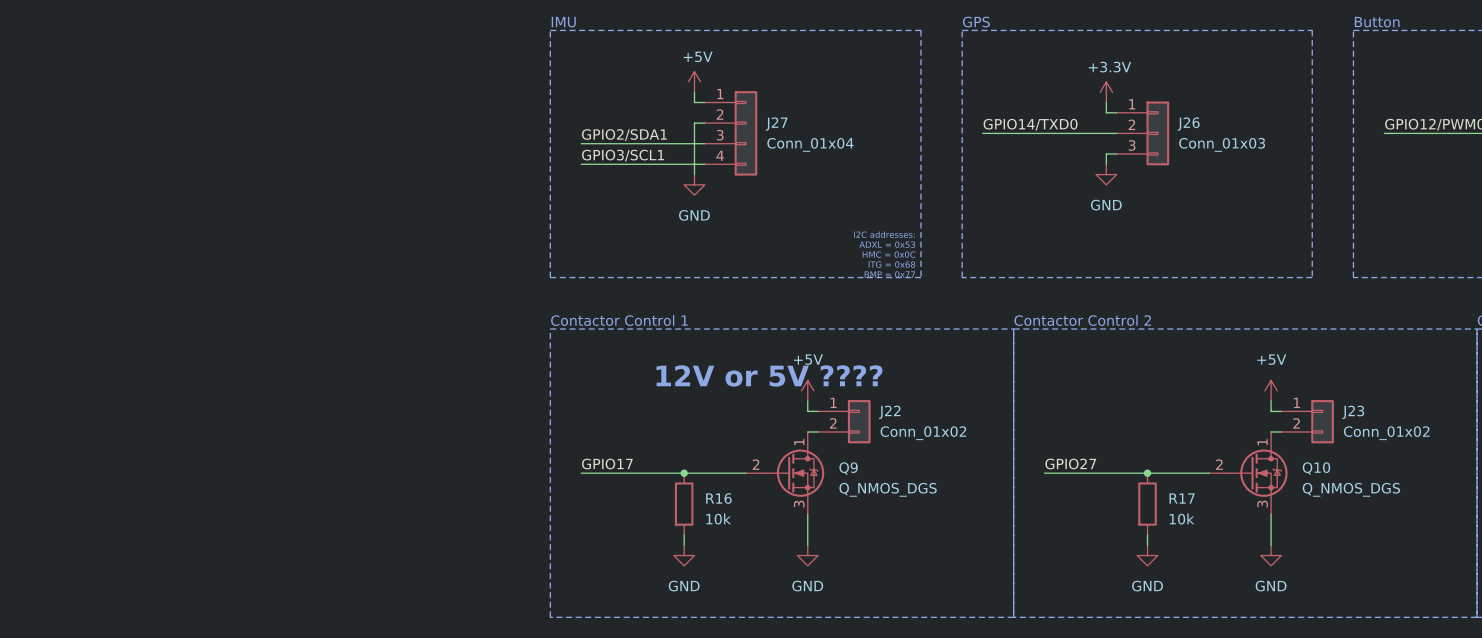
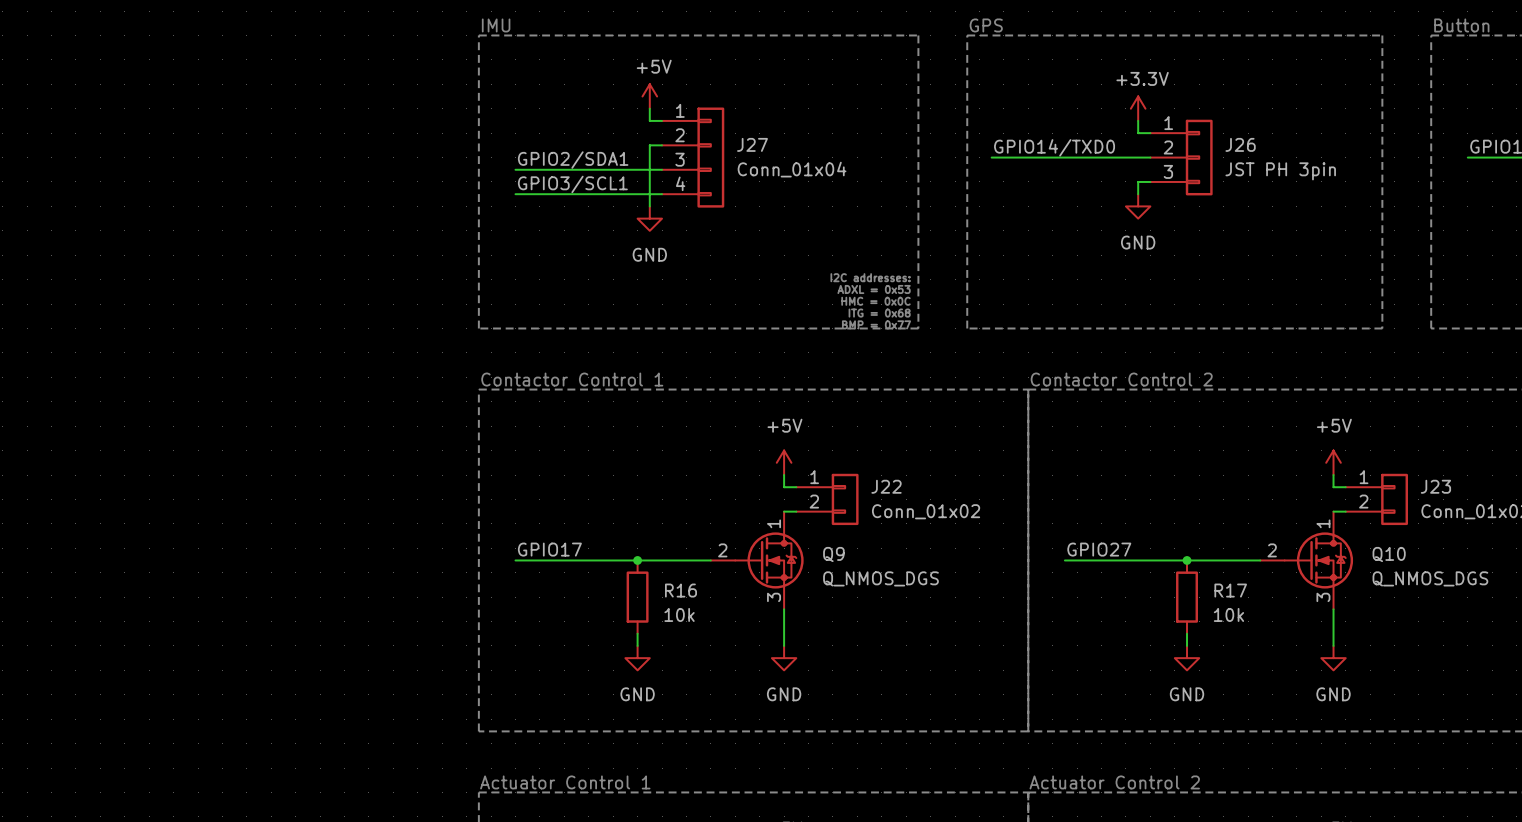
J26 value: Conn_01x03 (1222, 144) -> JST PH 3pin (1280, 171)
text: 12V or 5V ???? (769, 375) -> none

